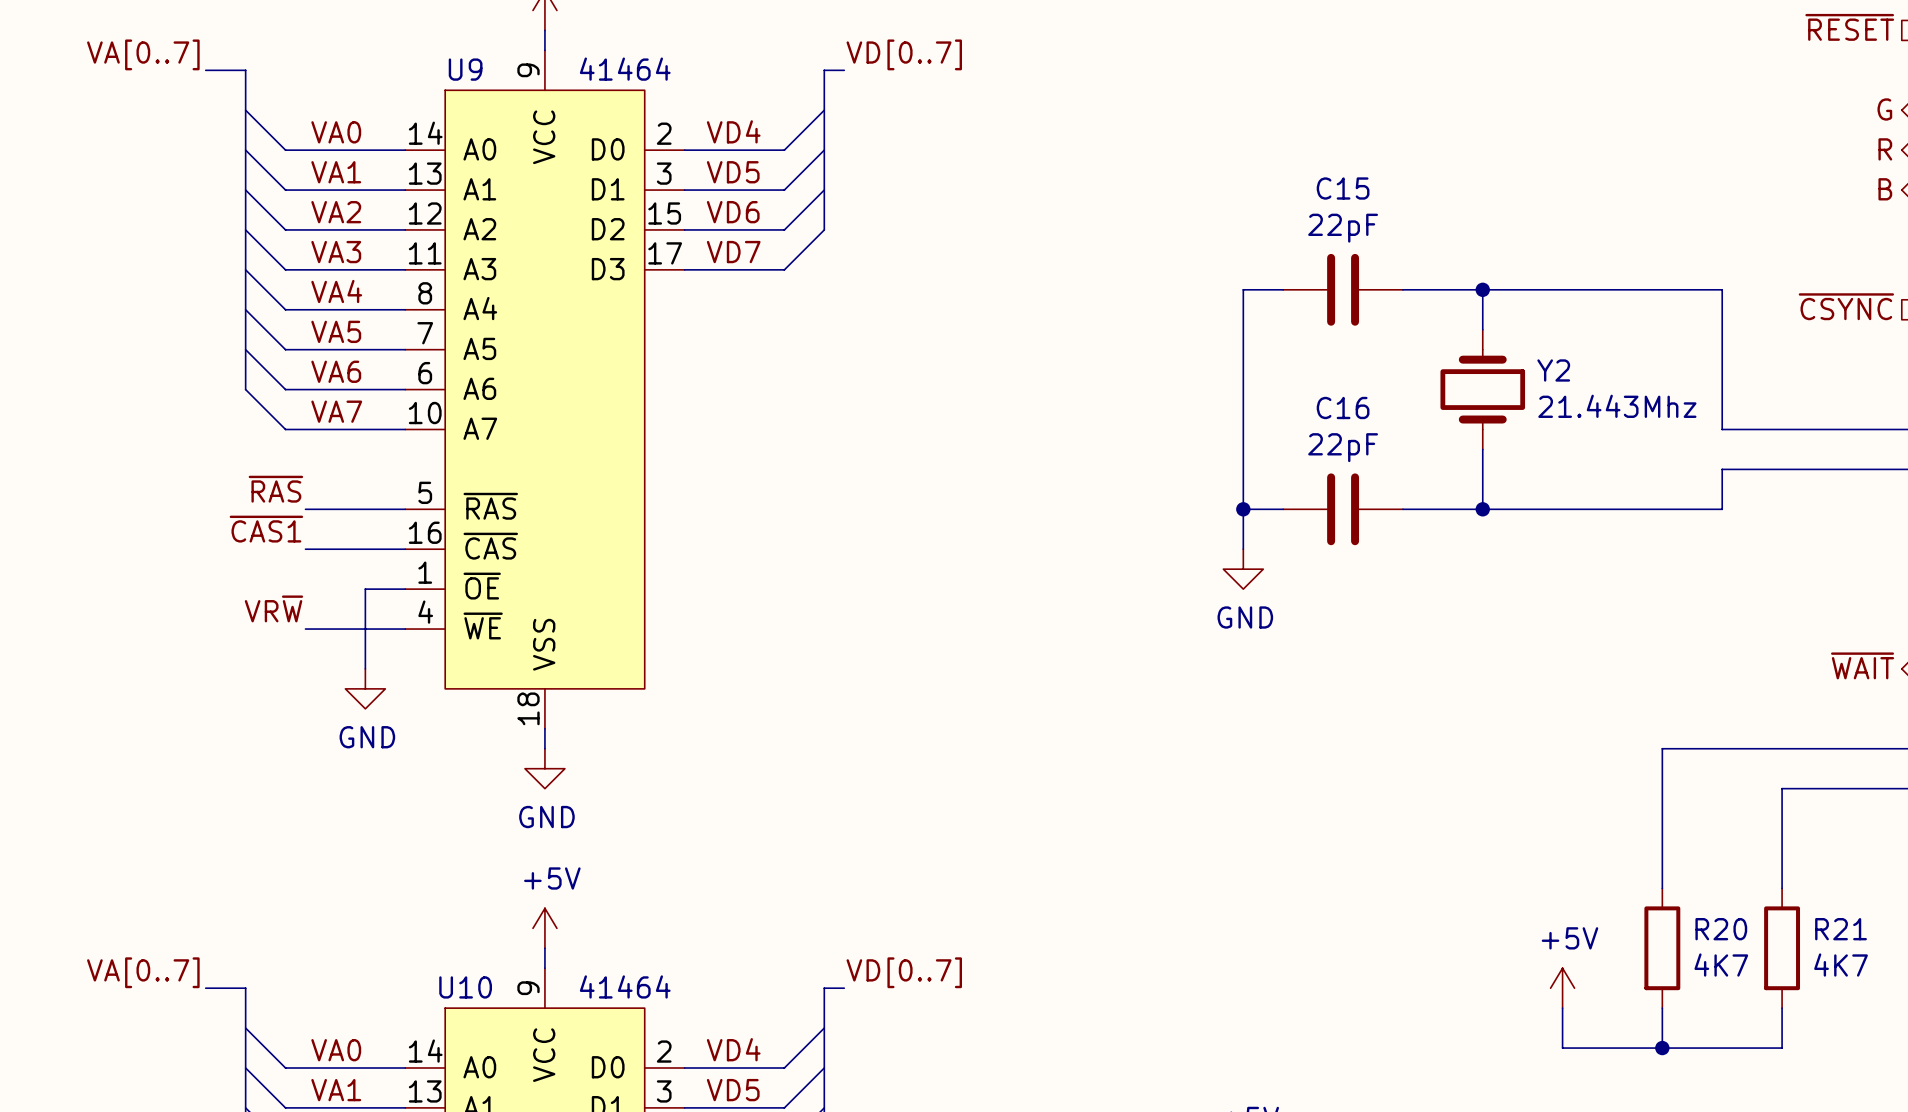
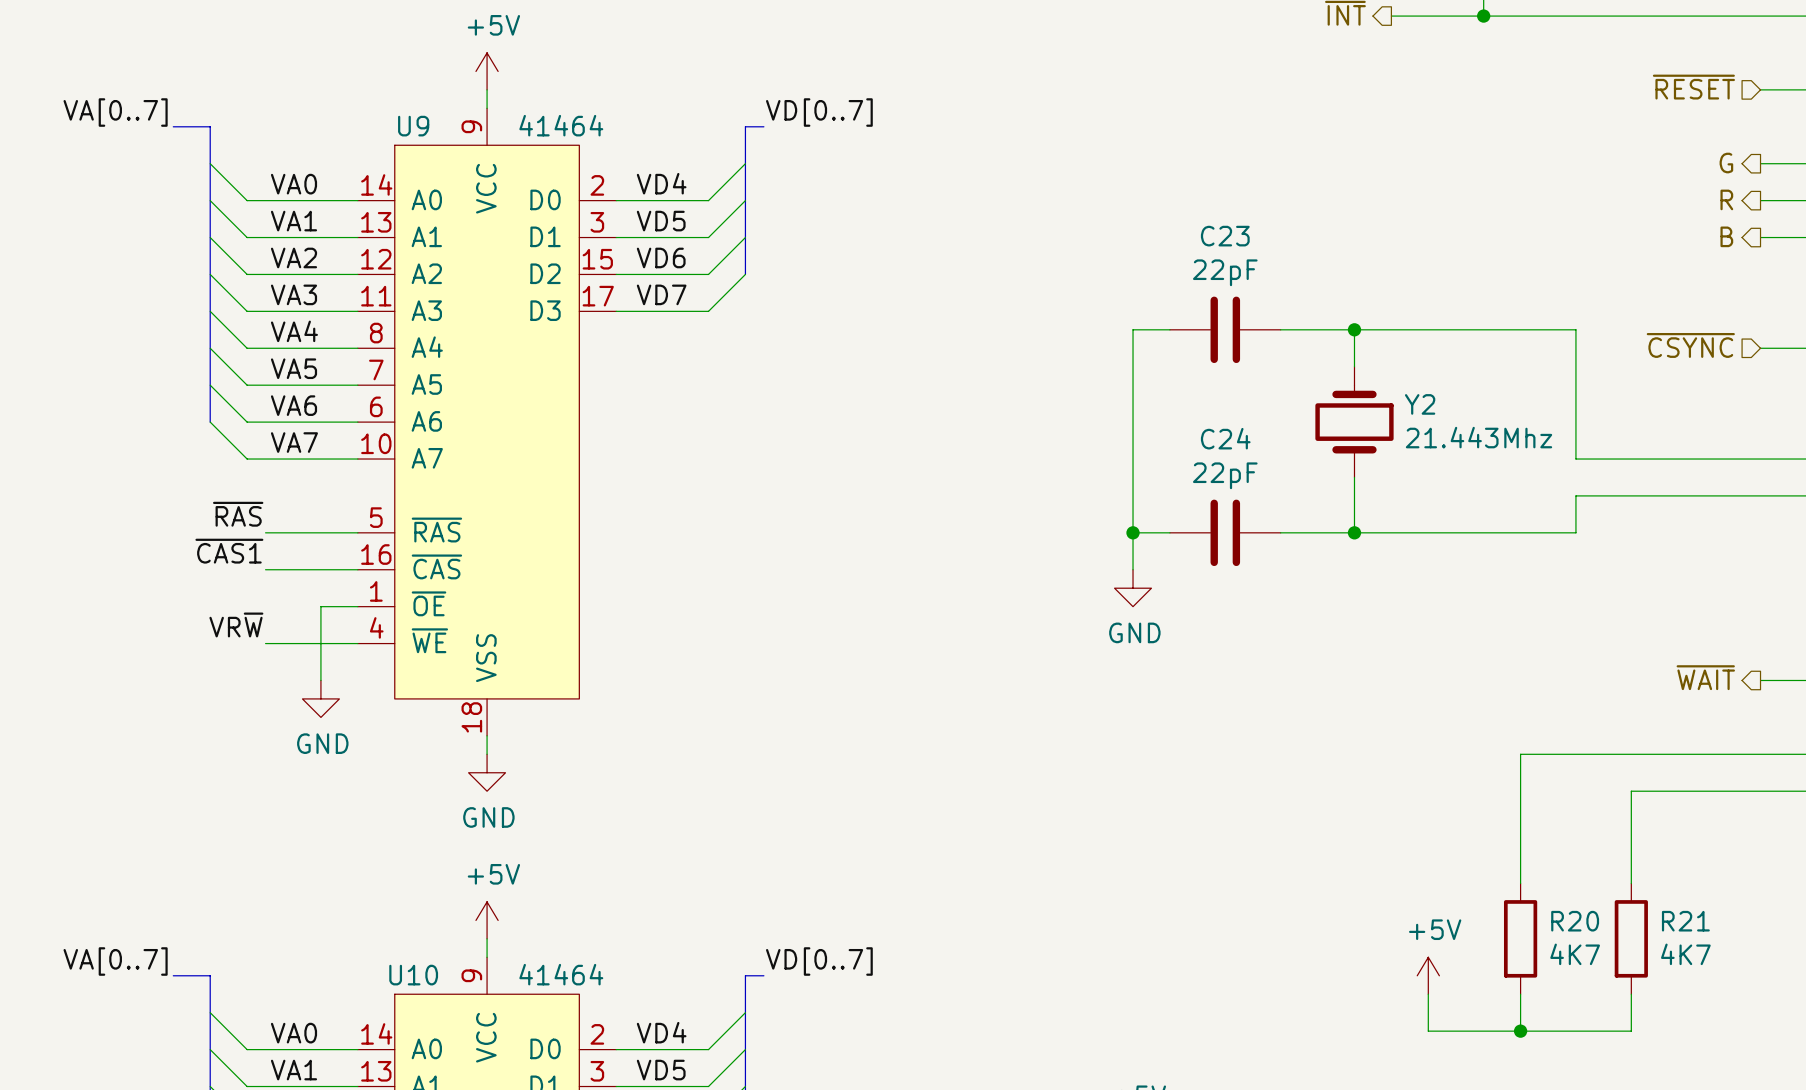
C15 name: C15 (1343, 188) -> C23 (1225, 236)
C16 name: C16 (1343, 407) -> C24 (1225, 438)

